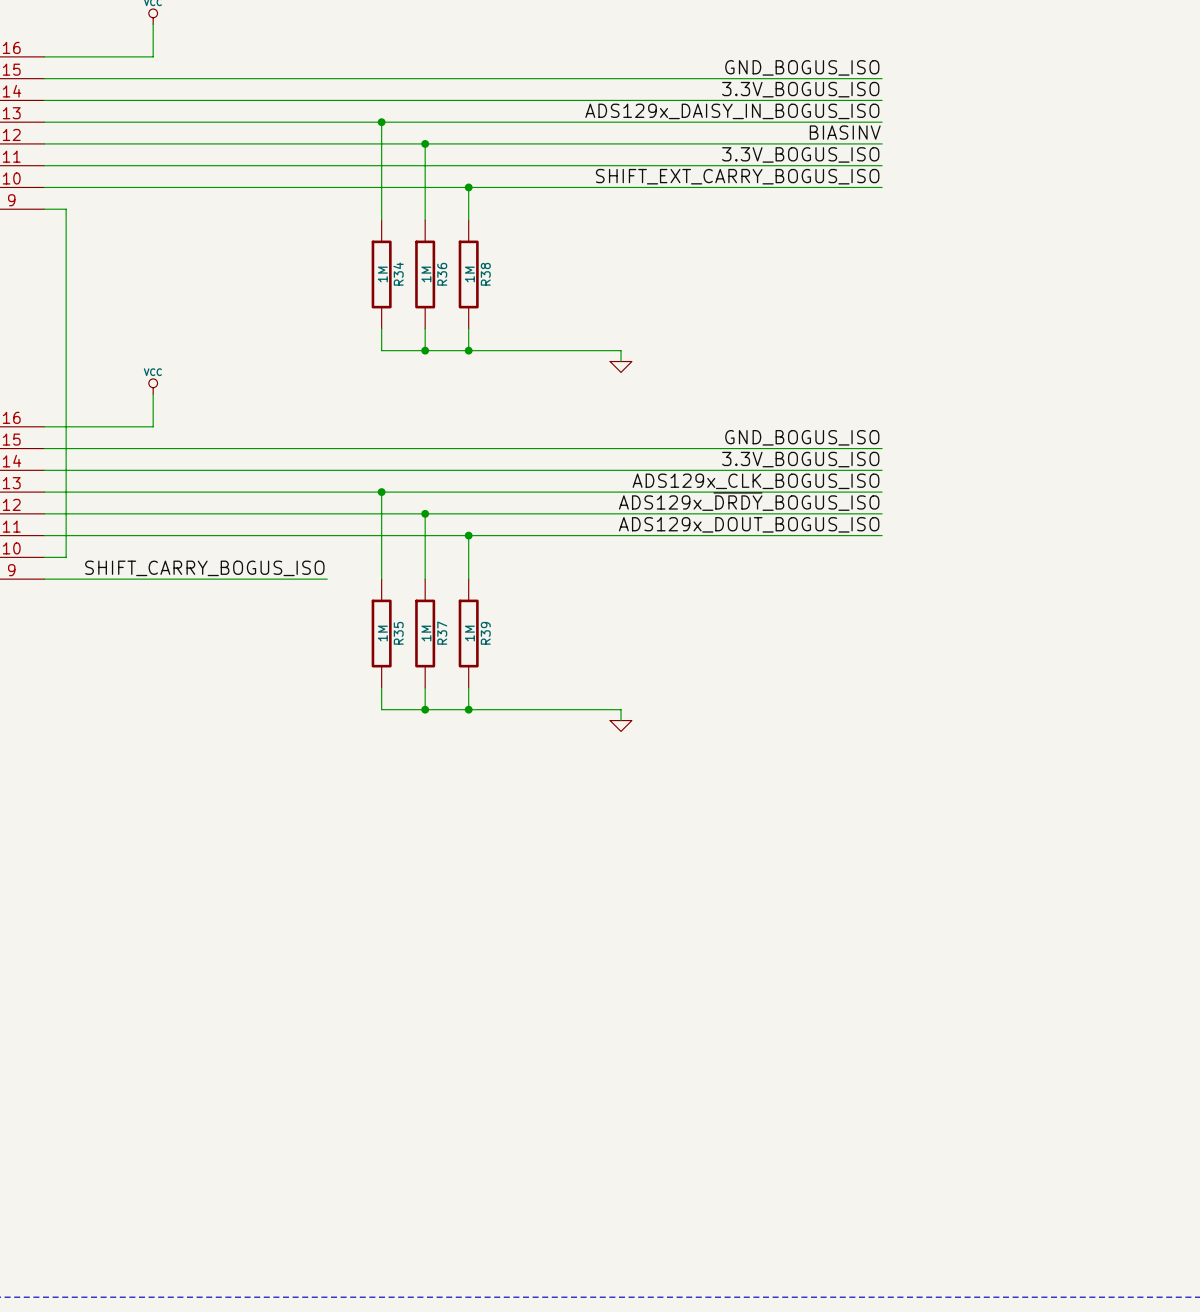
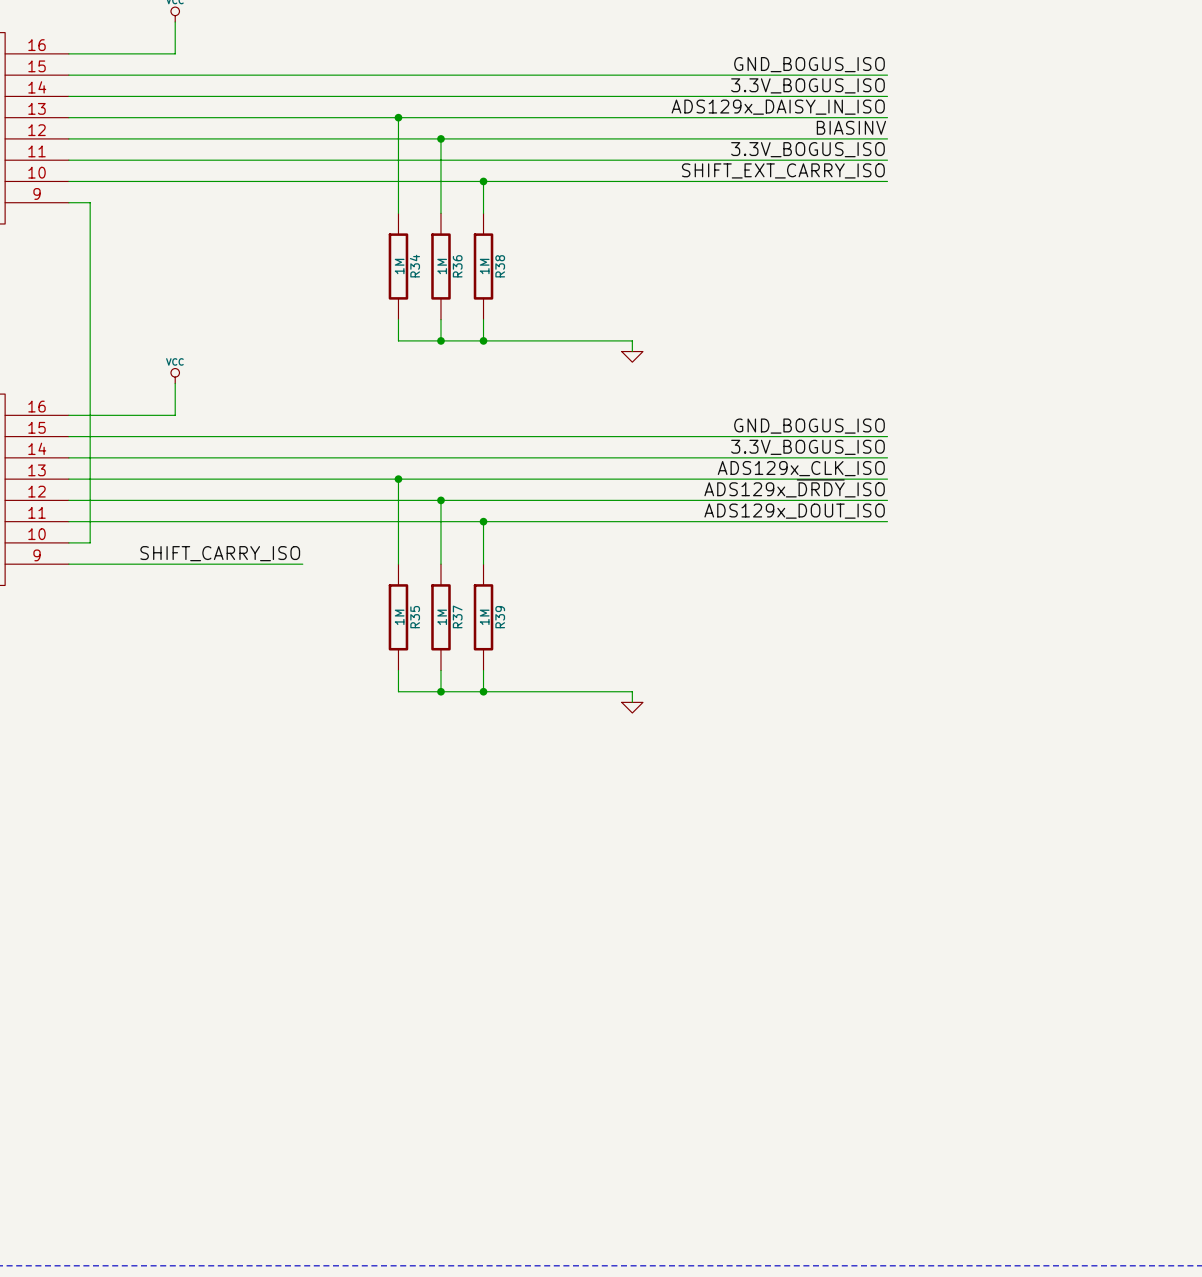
label: ADS129x_DAISY_IN_BOGUS_ISO (732, 111) -> ADS129x_DAISY_IN_ISO (778, 107)
label: SHIFT_EXT_CARRY_BOGUS_ISO (737, 176) -> SHIFT_EXT_CARRY_ISO (783, 170)
label: ADS129x_CLK_BOGUS_ISO (755, 481) -> ADS129x_CLK_ISO (801, 468)
label: ADS129x_~{DRDY}_BOGUS_ISO (749, 501) -> ADS129x_~{DRDY}_ISO (794, 488)
label: ADS129x_DOUT_BOGUS_ISO (749, 524) -> ADS129x_DOUT_ISO (794, 511)
label: SHIFT_CARRY_BOGUS_ISO (204, 568) -> SHIFT_CARRY_ISO (220, 553)
wire: (283, 579) (327, 579) -> none

